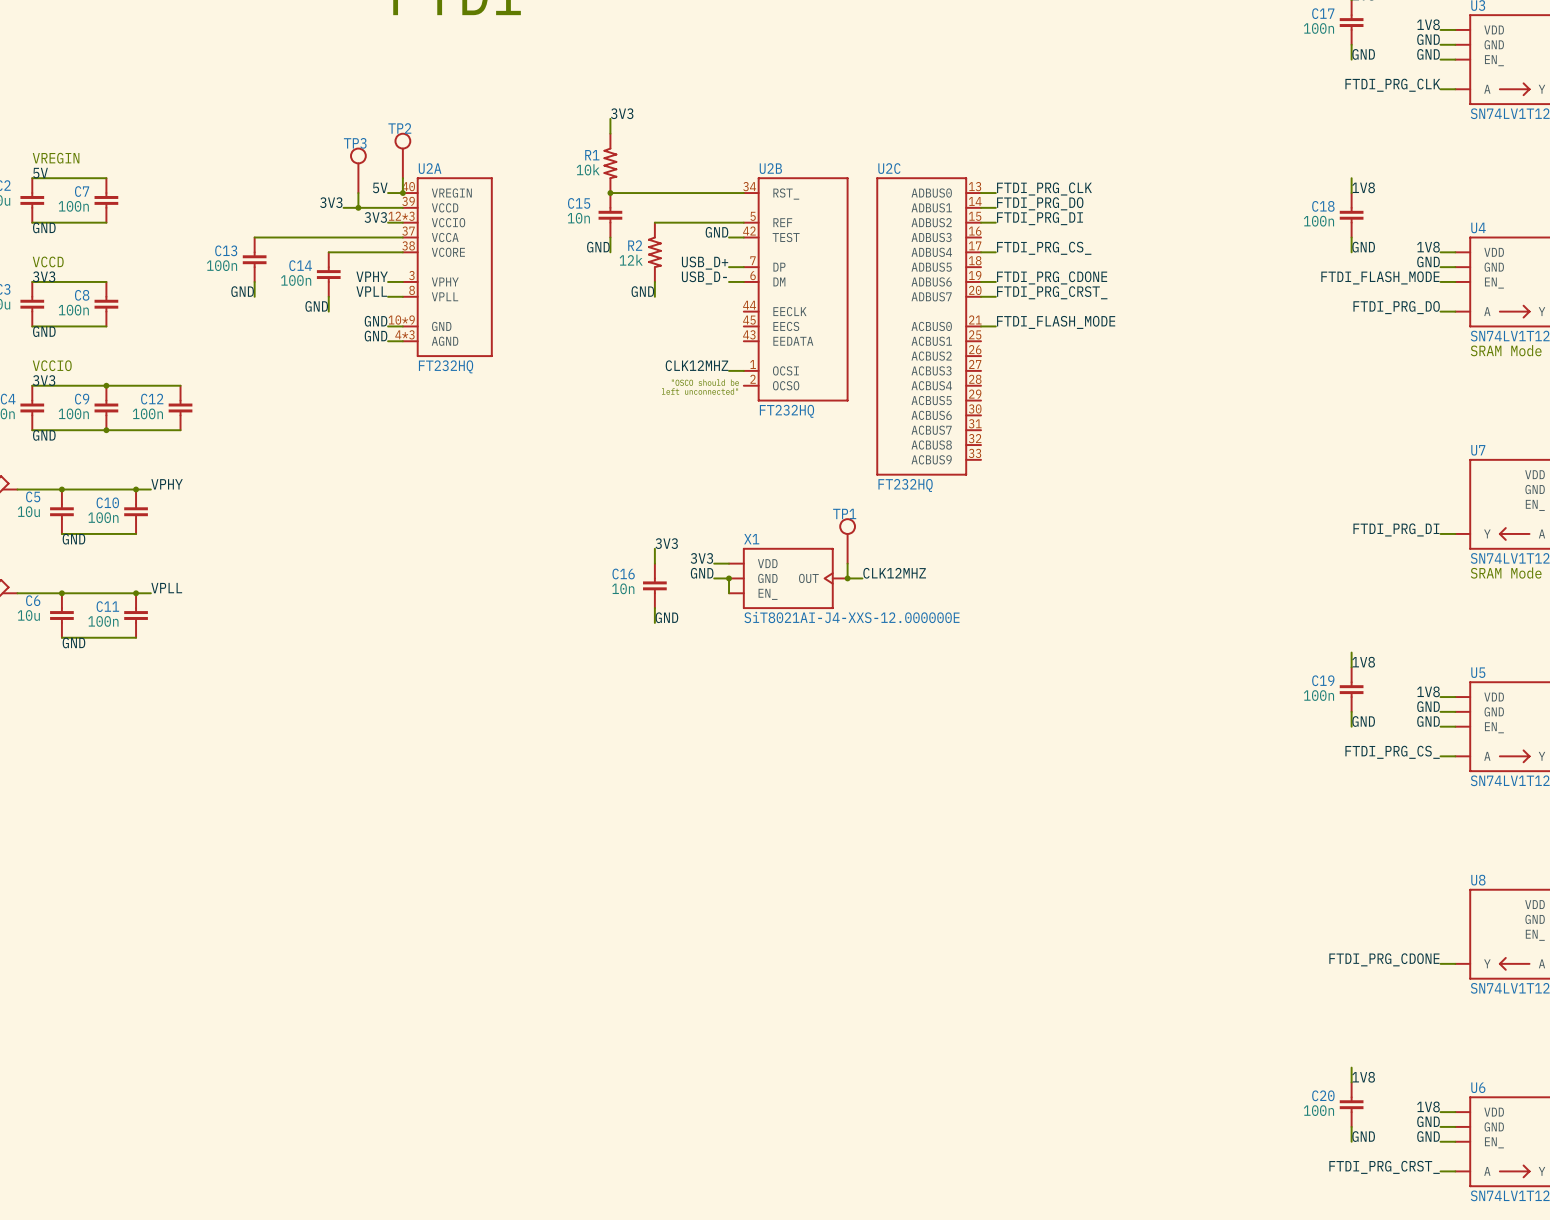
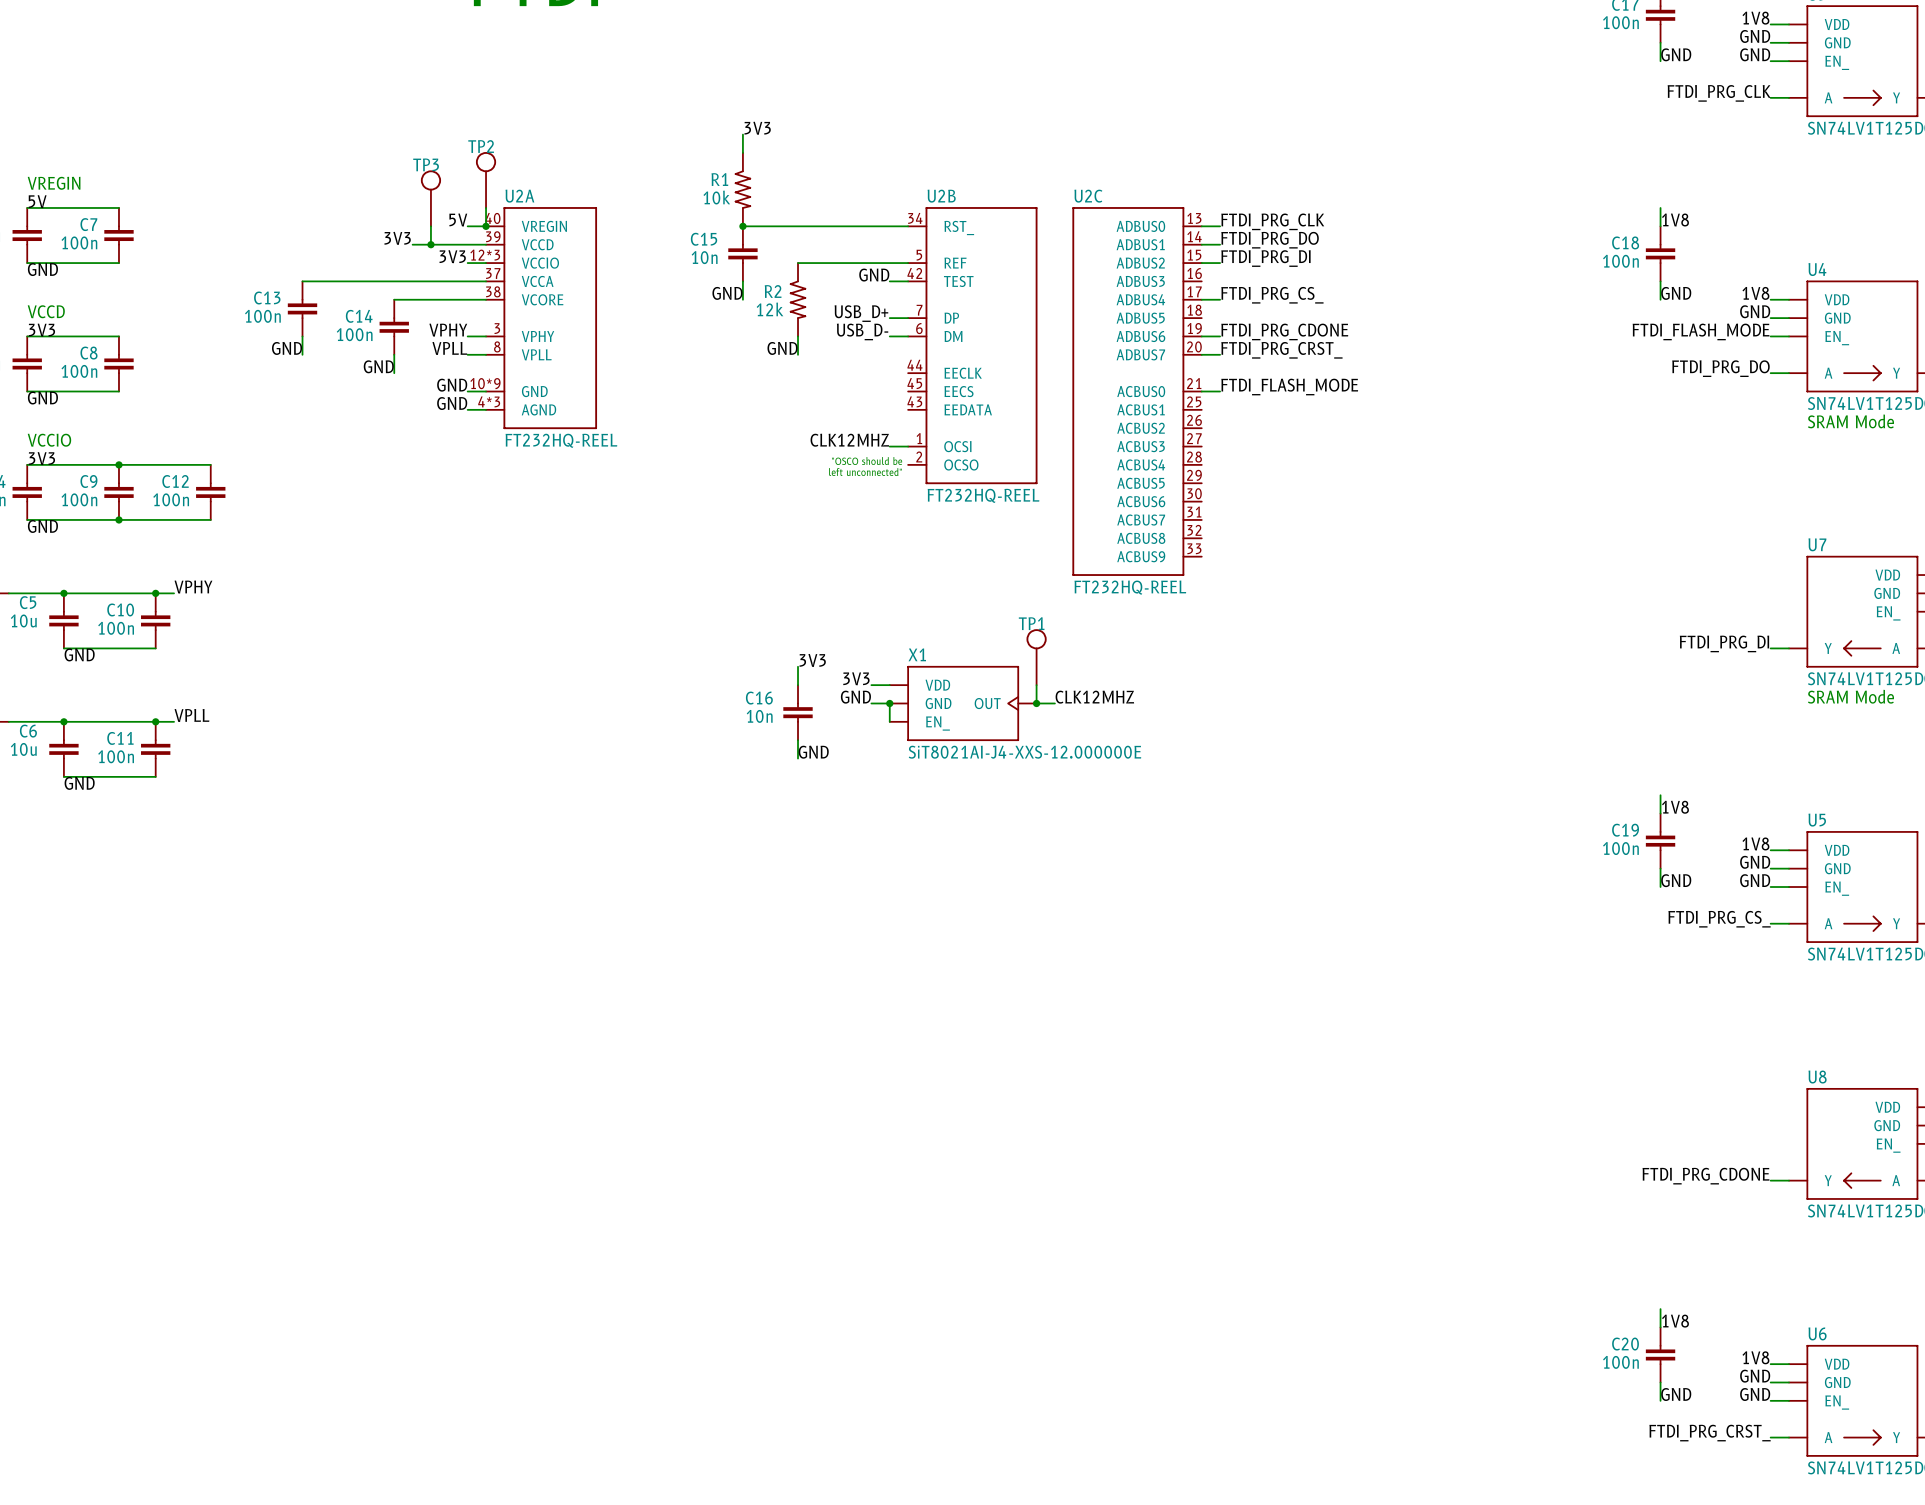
U2A text: FT232HQ (446, 366) -> FT232HQ-REEL (561, 440)
U2B text: FT232HQ (786, 411) -> FT232HQ-REEL (983, 495)
U2C text: FT232HQ (905, 485) -> FT232HQ-REEL (1130, 587)

